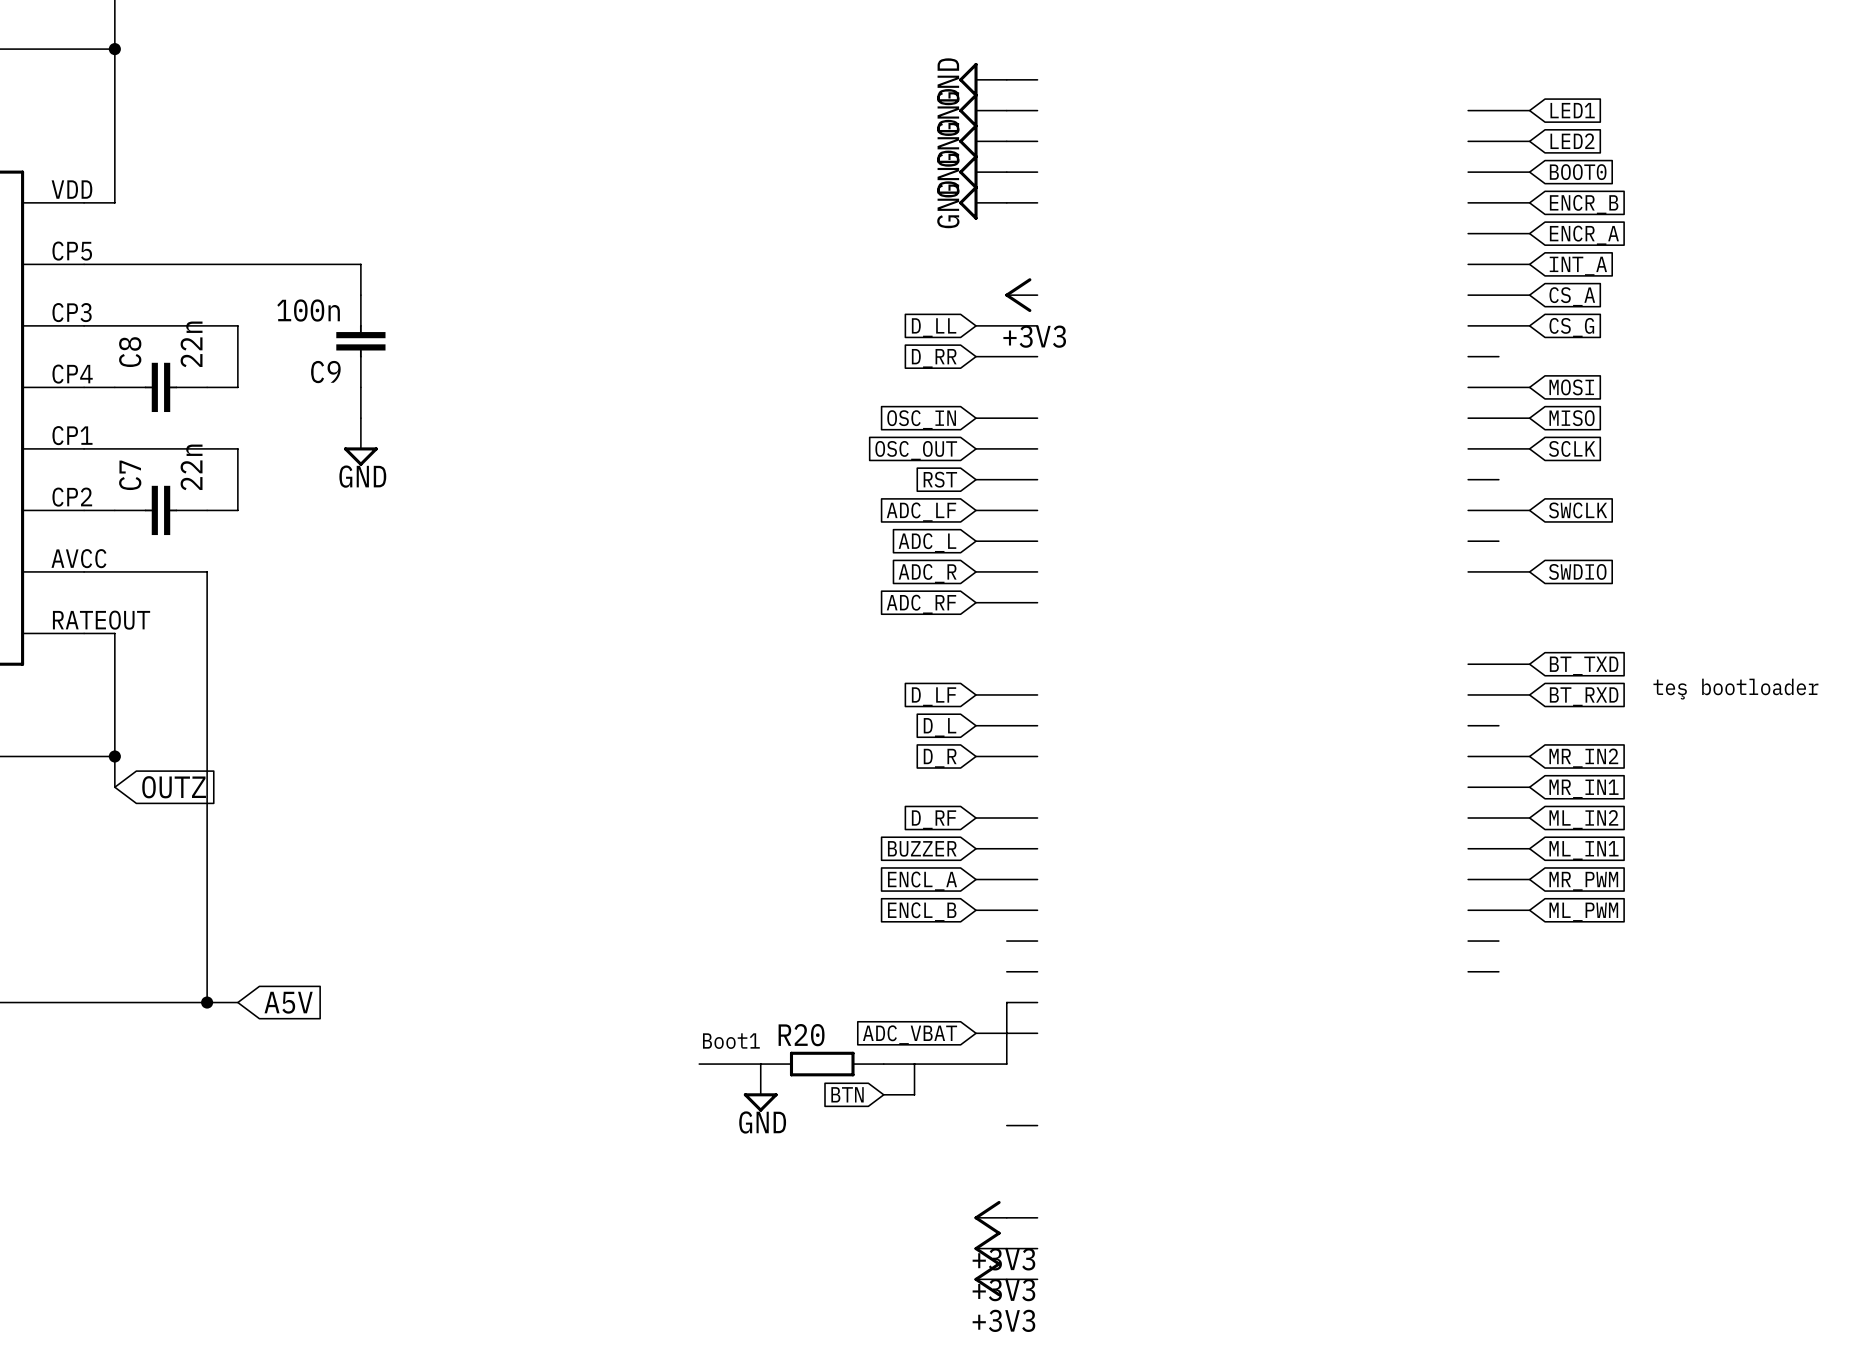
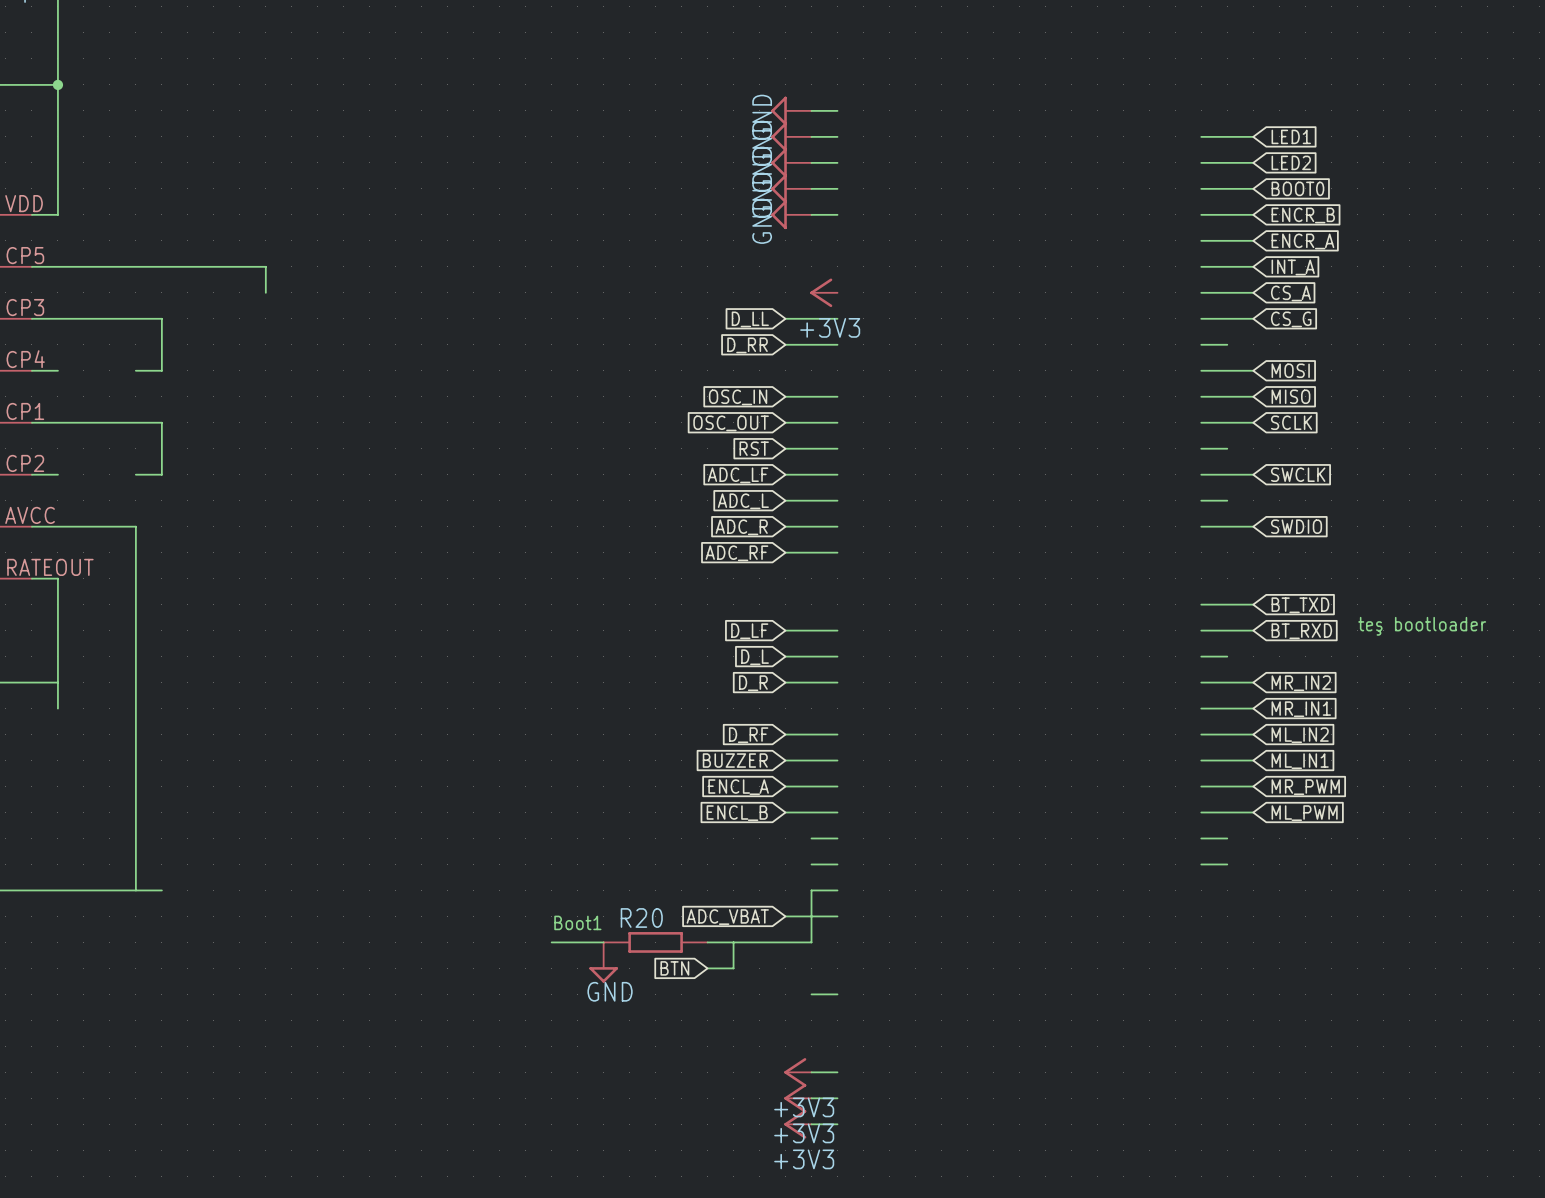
C9: 100n (360, 341) -> none
C8: 22n (160, 387) -> none
wire: (360, 387) (360, 418) -> none
power symbol: GND (360, 442) -> none
C7: 22n (160, 510) -> none
junction: (114, 756) -> none
global label: OUTZ (174, 787) -> none
junction: (207, 1002) -> none
global label: A5V (288, 1002) -> none

